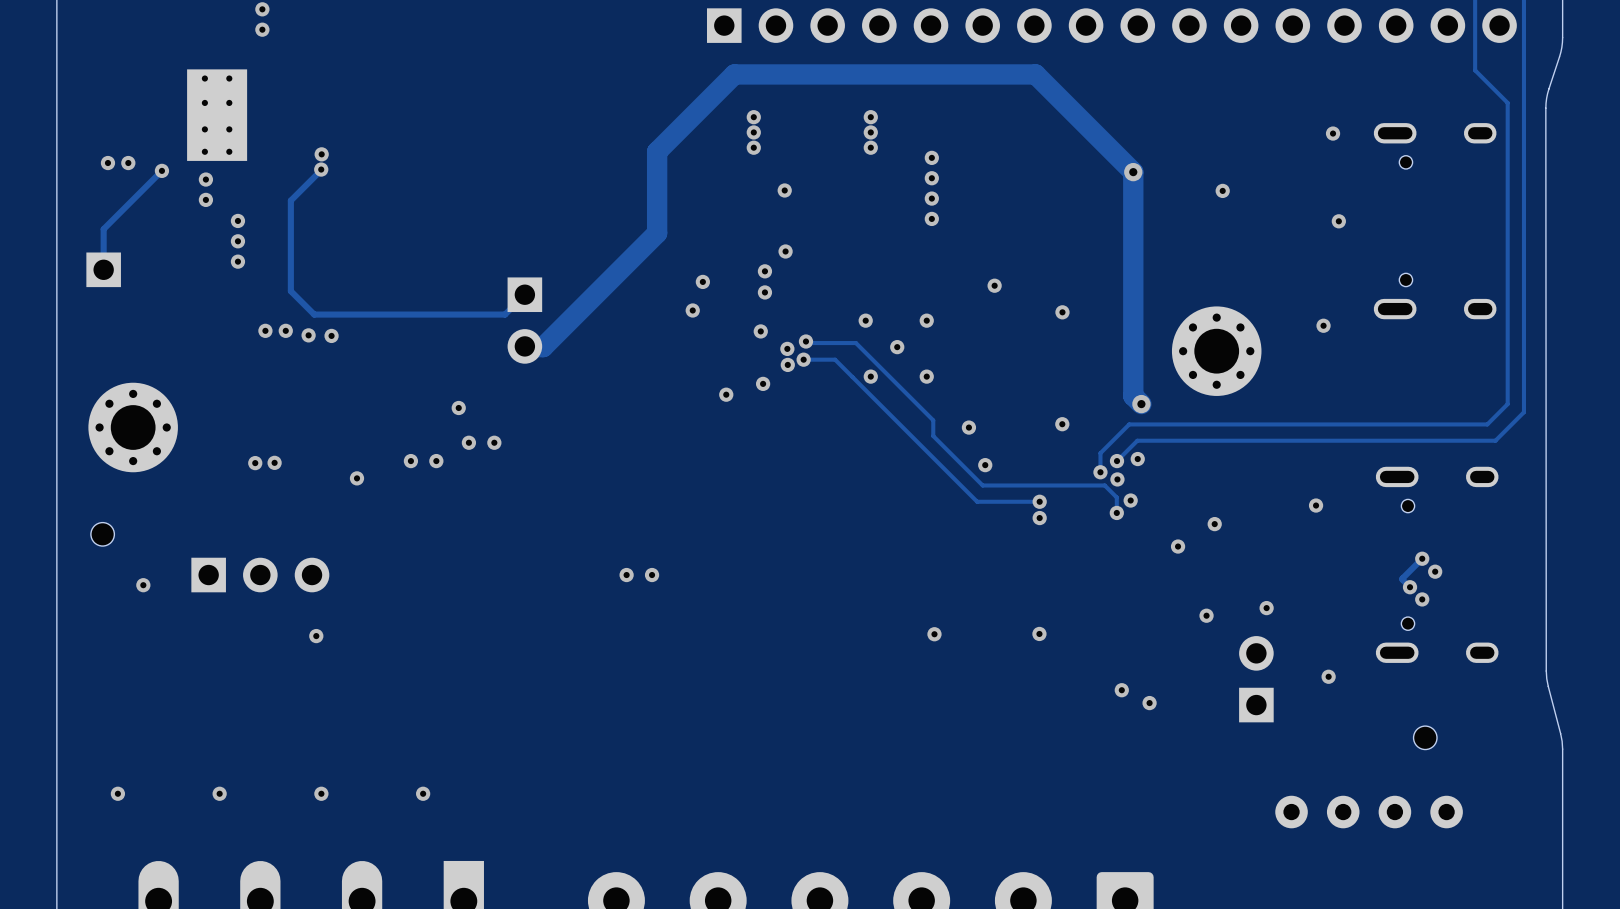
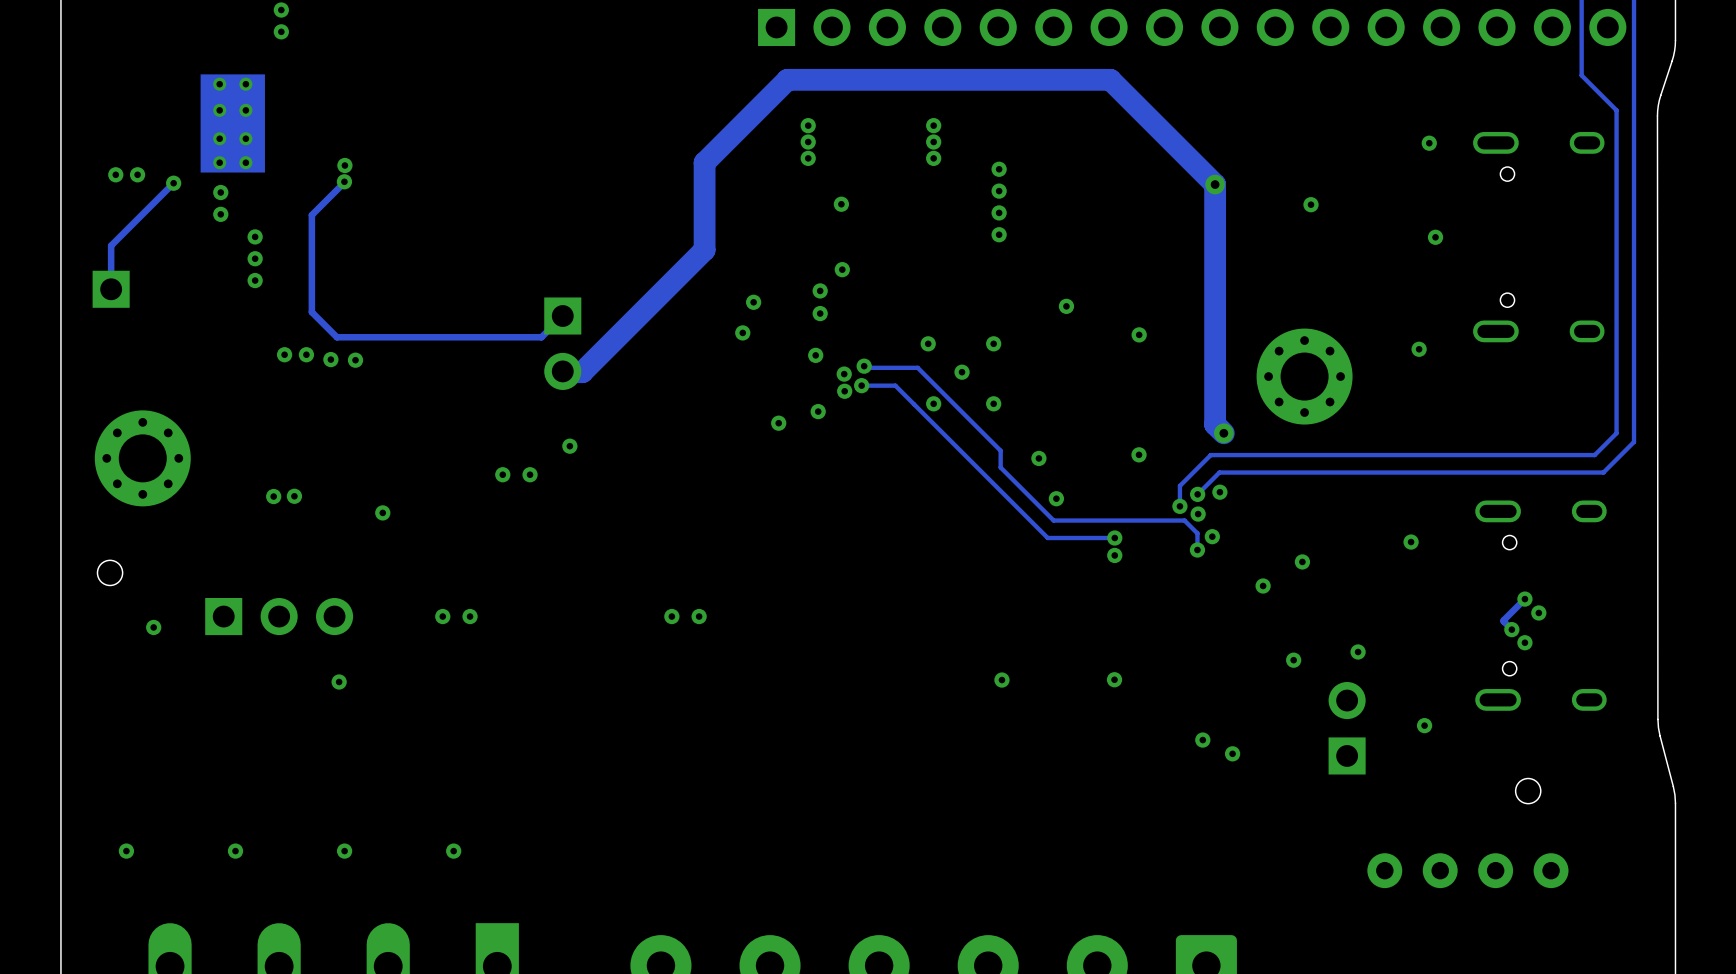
via: (458, 407) -> none
via: none -> (569, 446)
via: (410, 461) -> none
via: (436, 461) -> none
via: none -> (442, 616)
via: none -> (470, 616)

